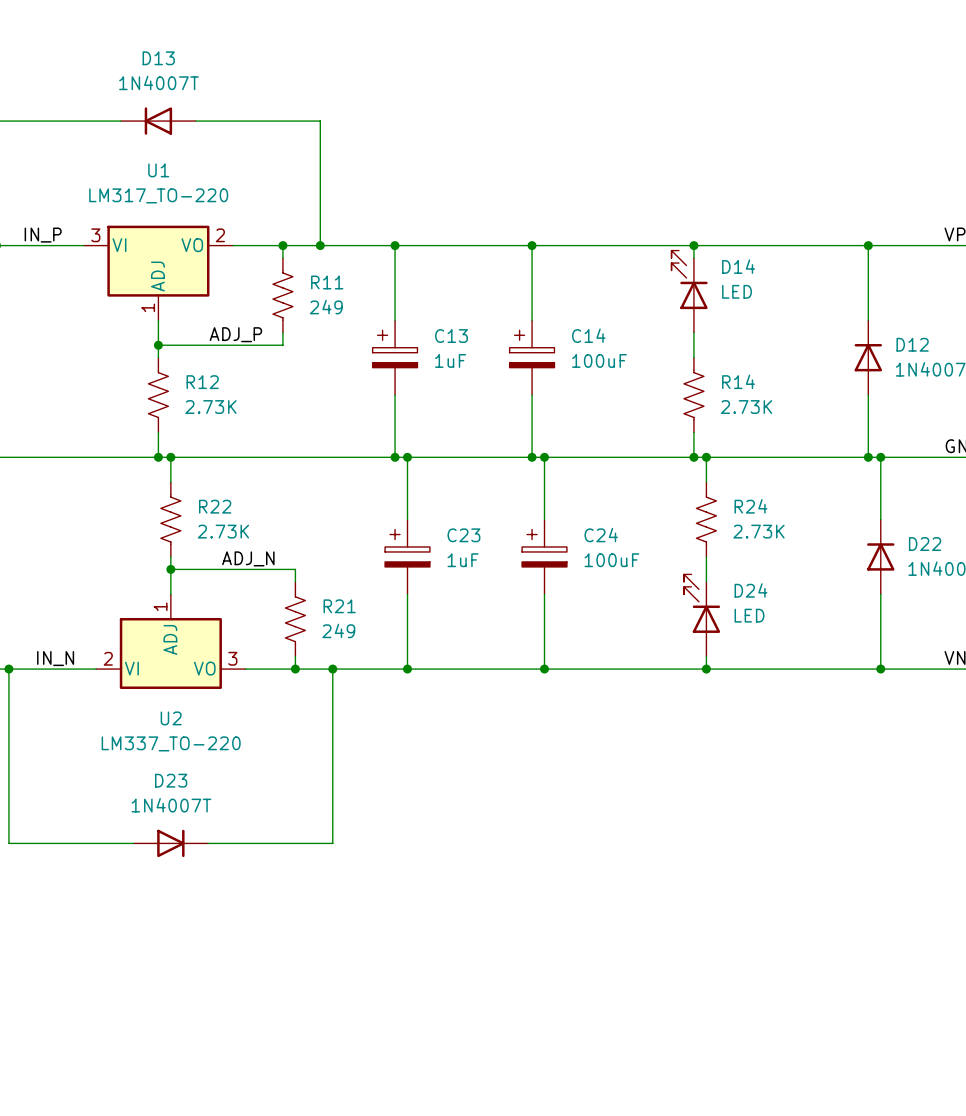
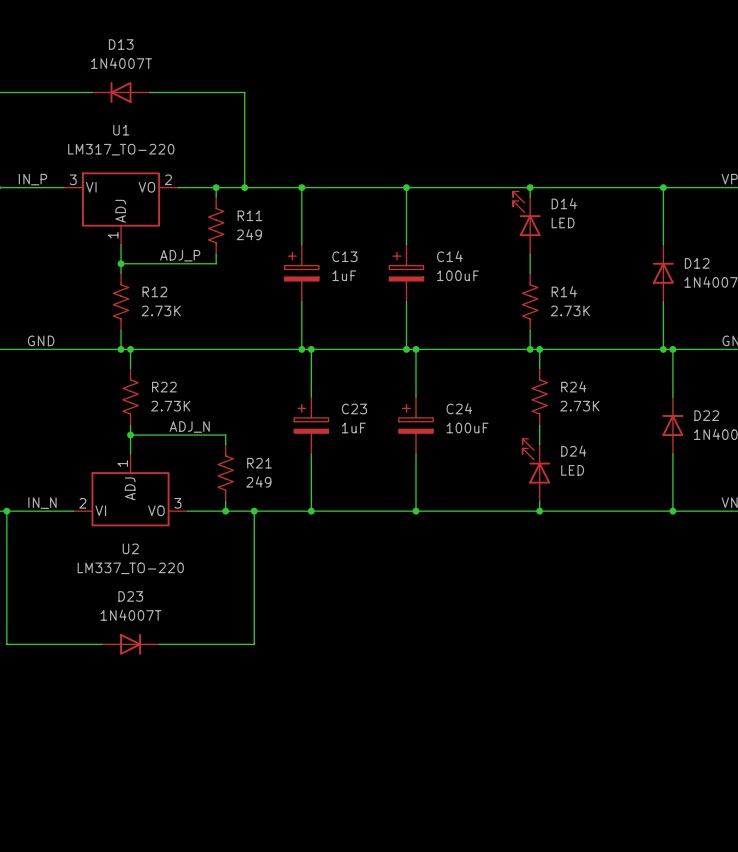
label: none -> GND (41, 340)

